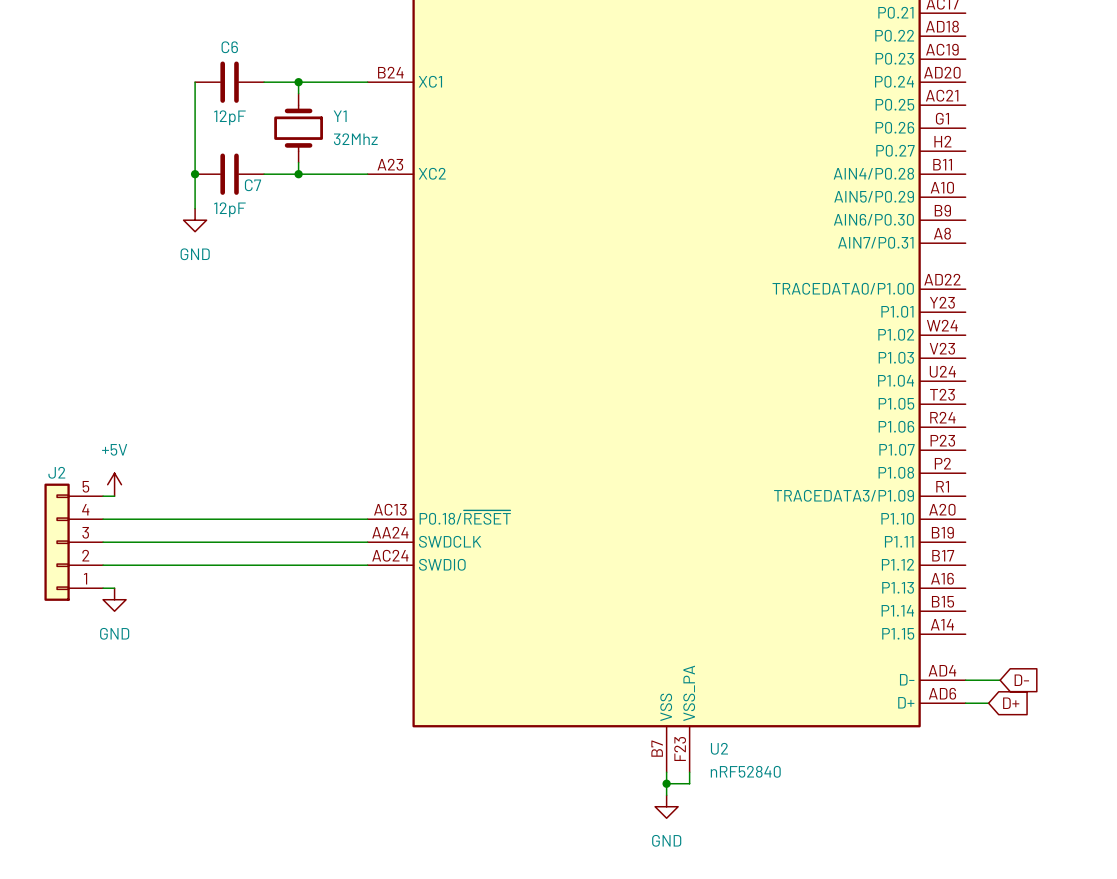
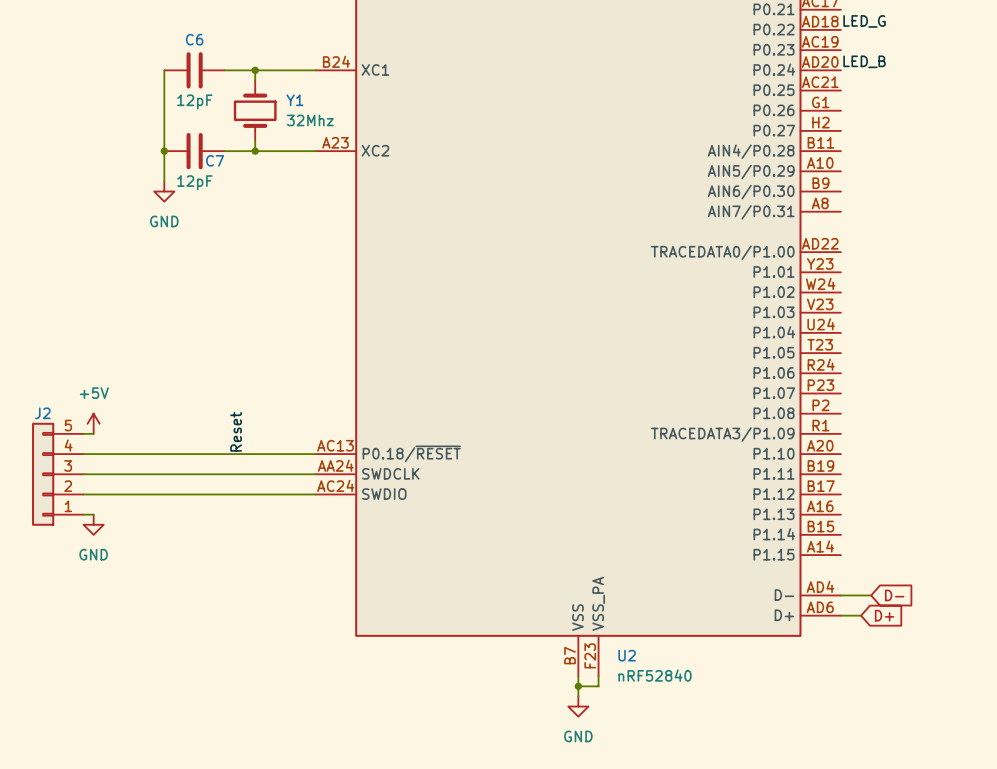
label: none -> LED_G (864, 21)
label: none -> LED_B (864, 61)
label: none -> Reset (236, 431)

